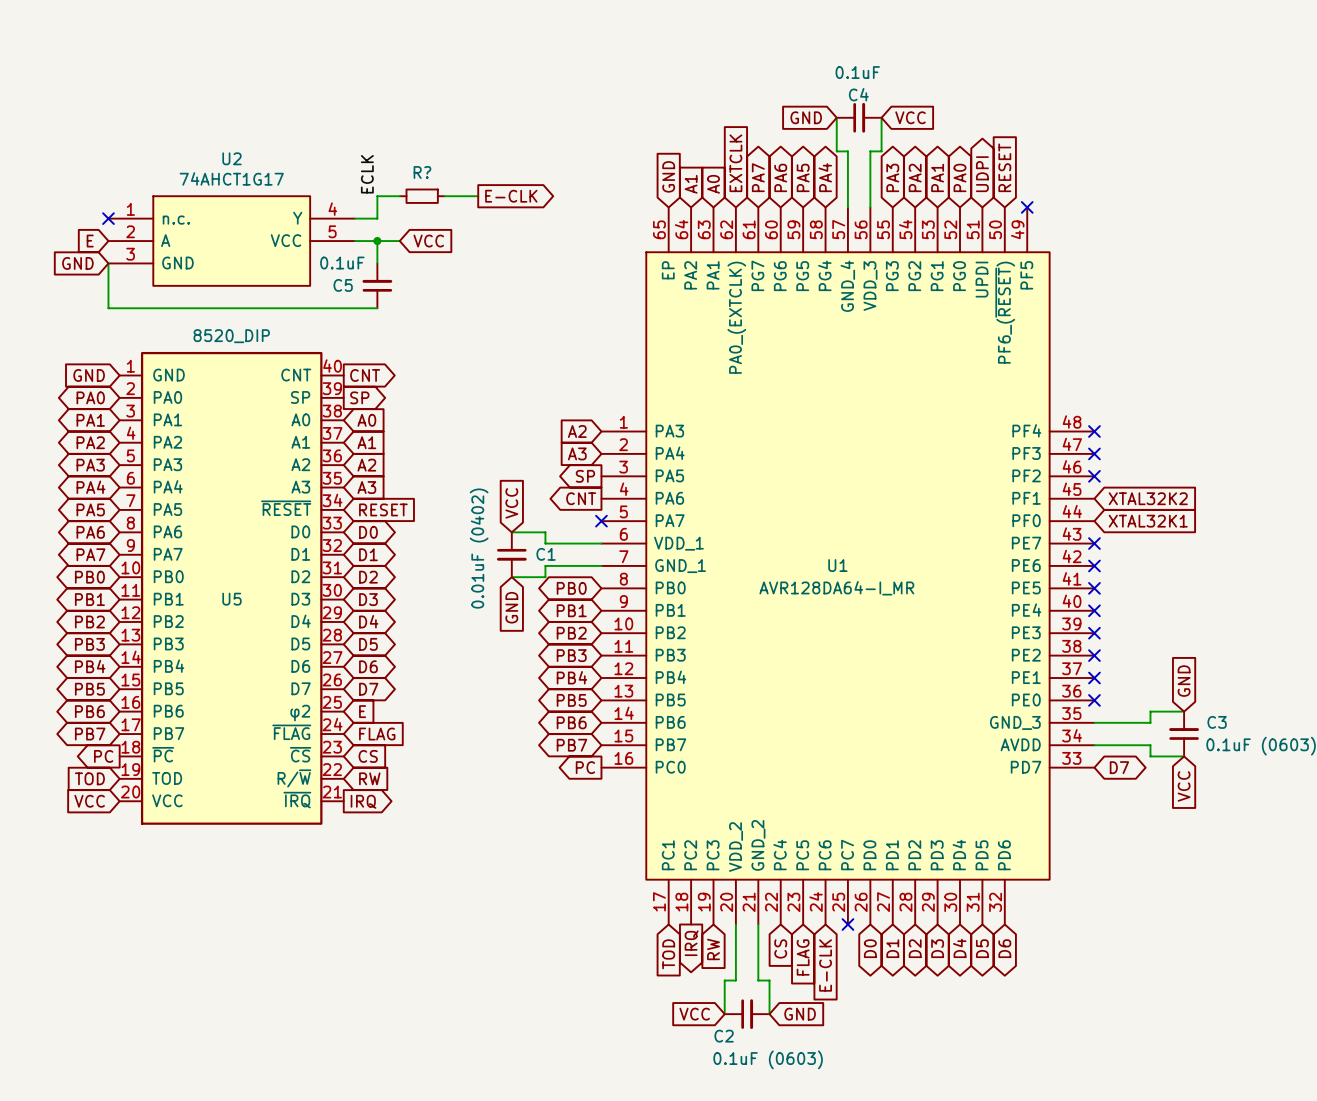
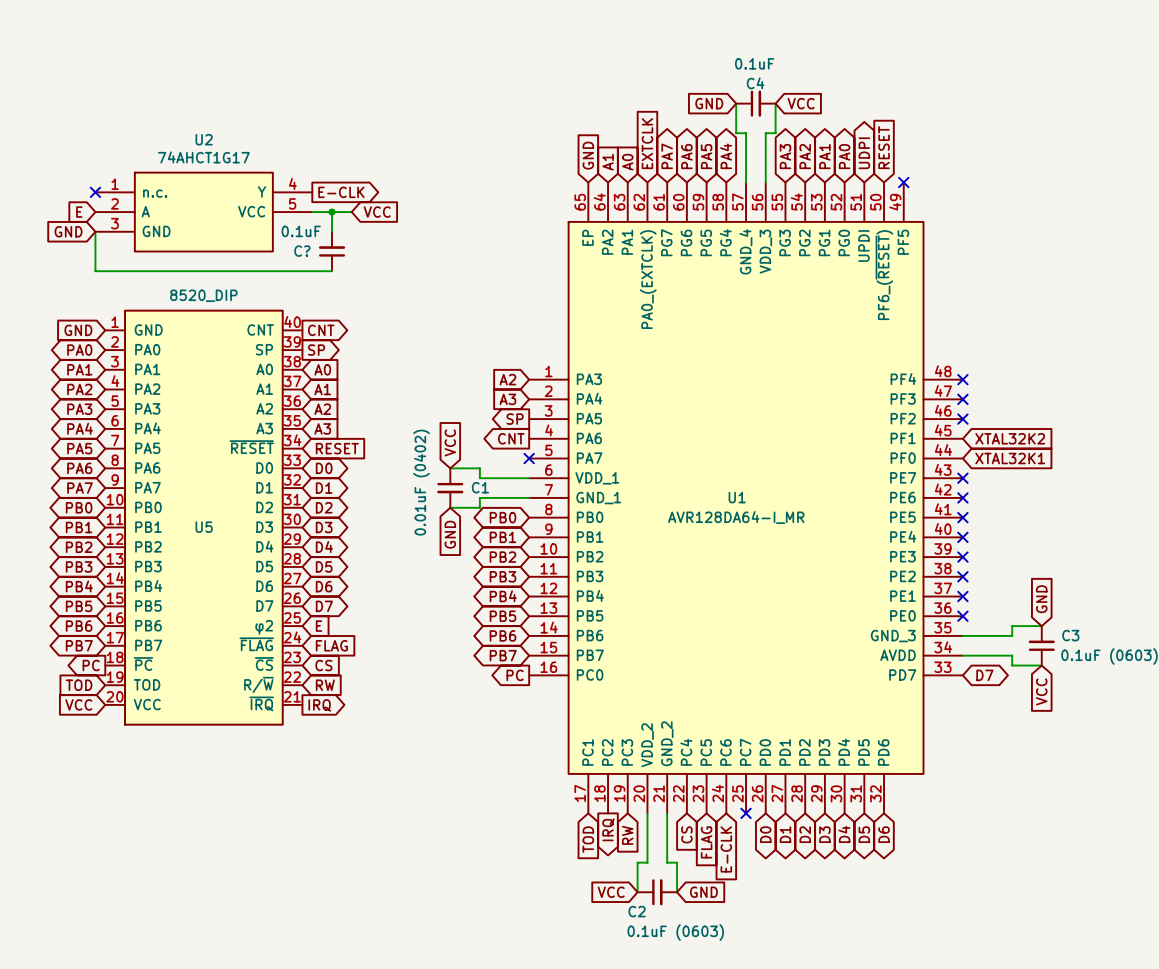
label: ECLK (367, 174) -> none
wire: (399, 196) (377, 196) (377, 218) (354, 218) -> none
R?: (422, 196) -> none
wire: (444, 196) (478, 196) -> none
global label position: E-CLK (511, 196) -> E-CLK (341, 192)
C5 name: C5 (343, 285) -> C? (302, 251)

